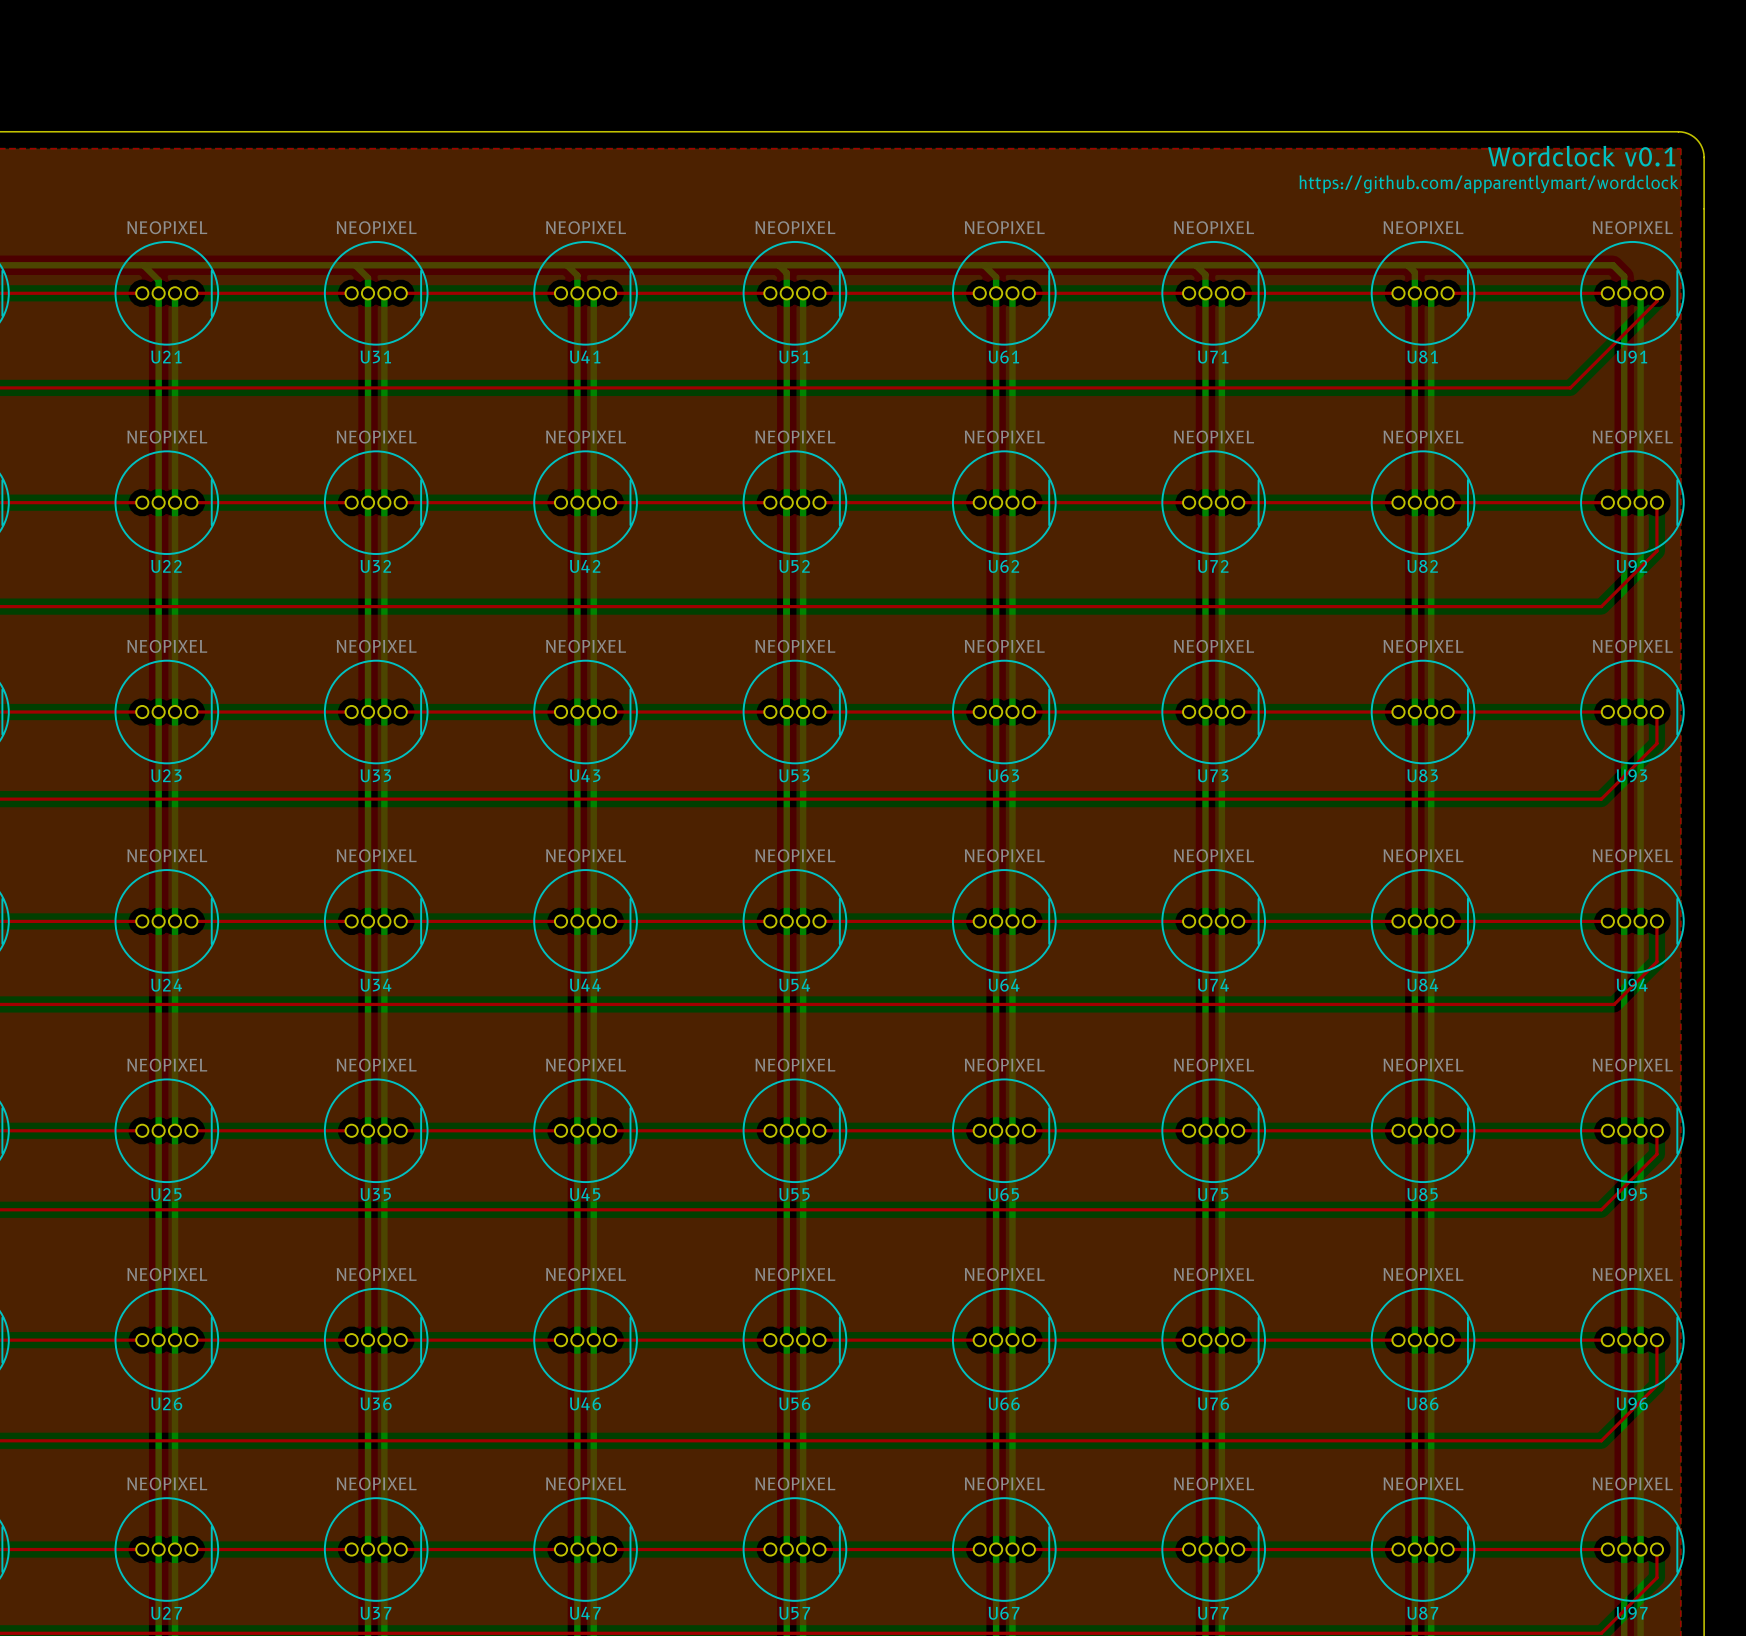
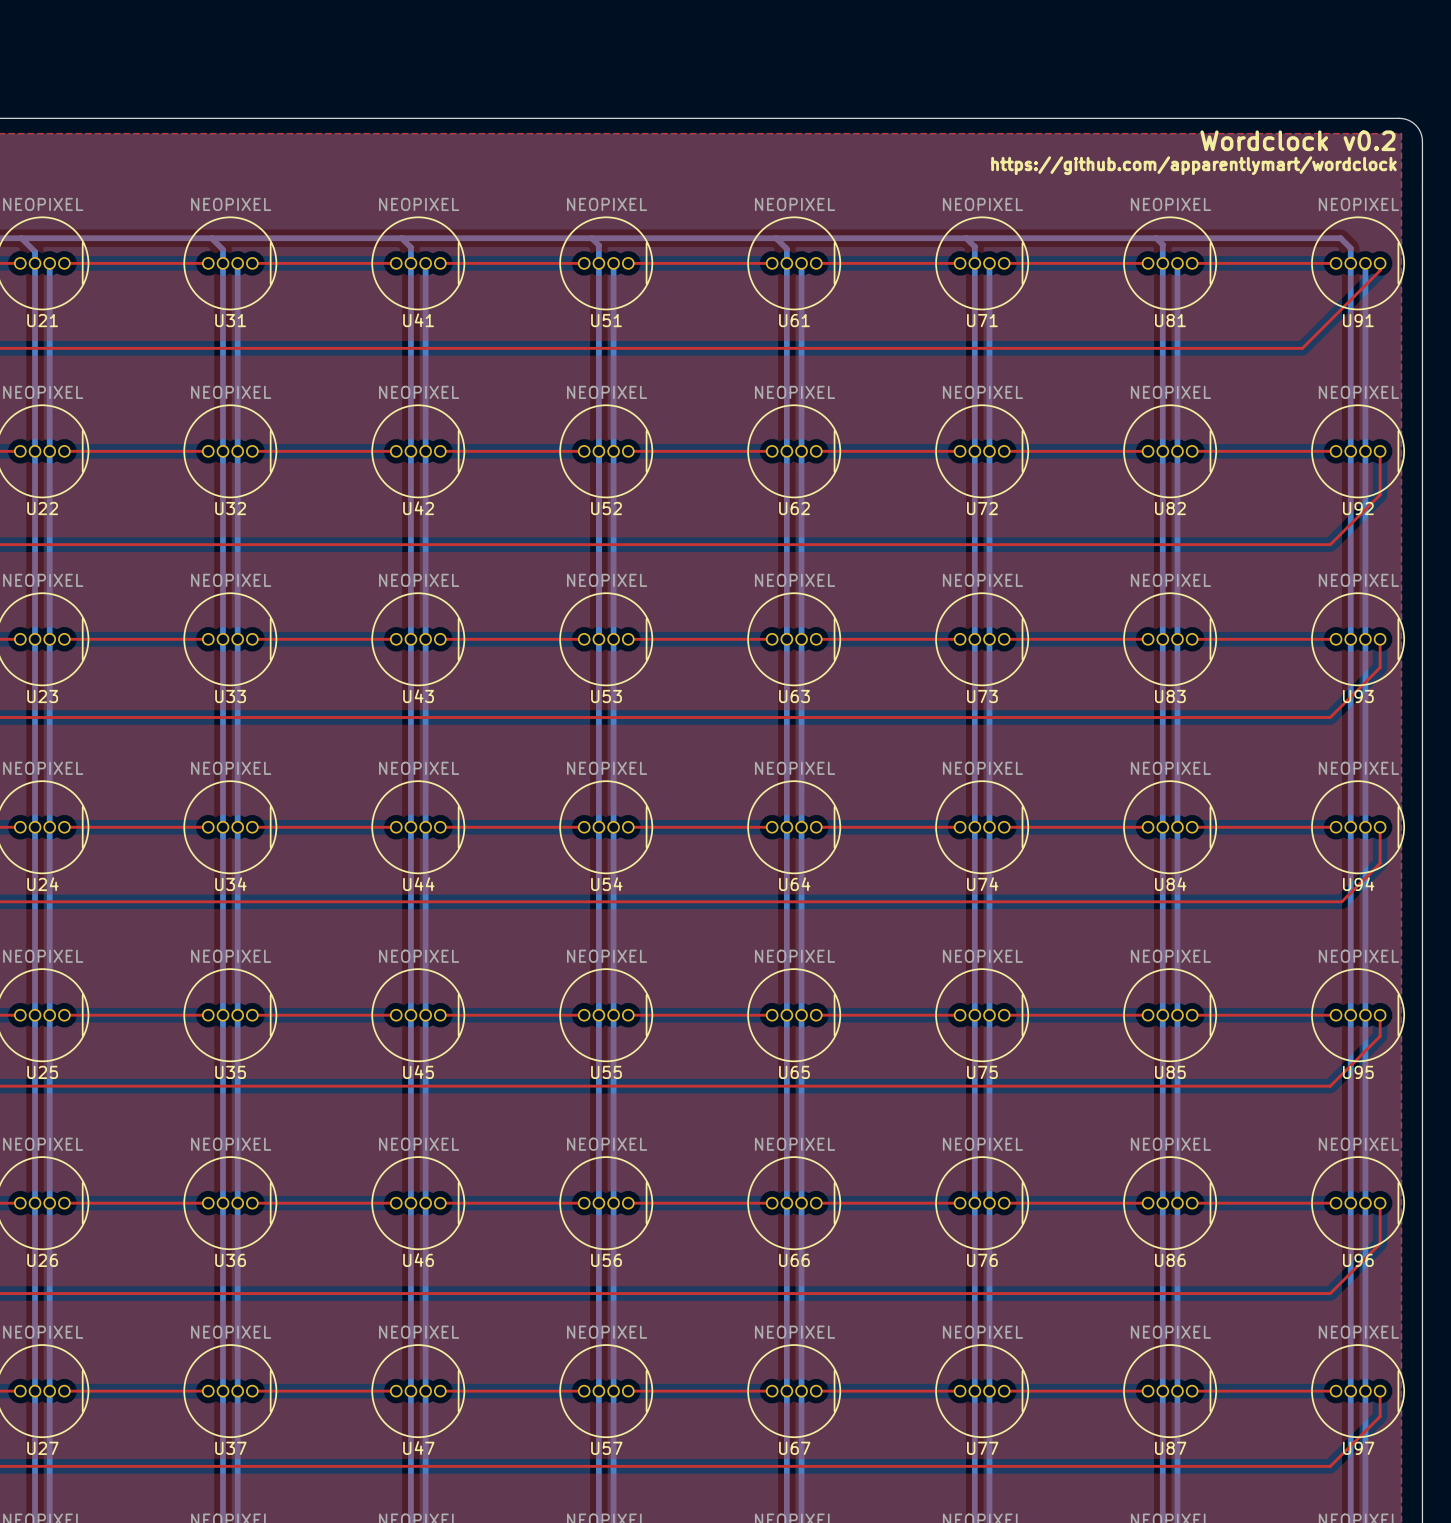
text: Wordclock v0.1 (1581, 156) -> Wordclock v0.2 (1297, 140)

